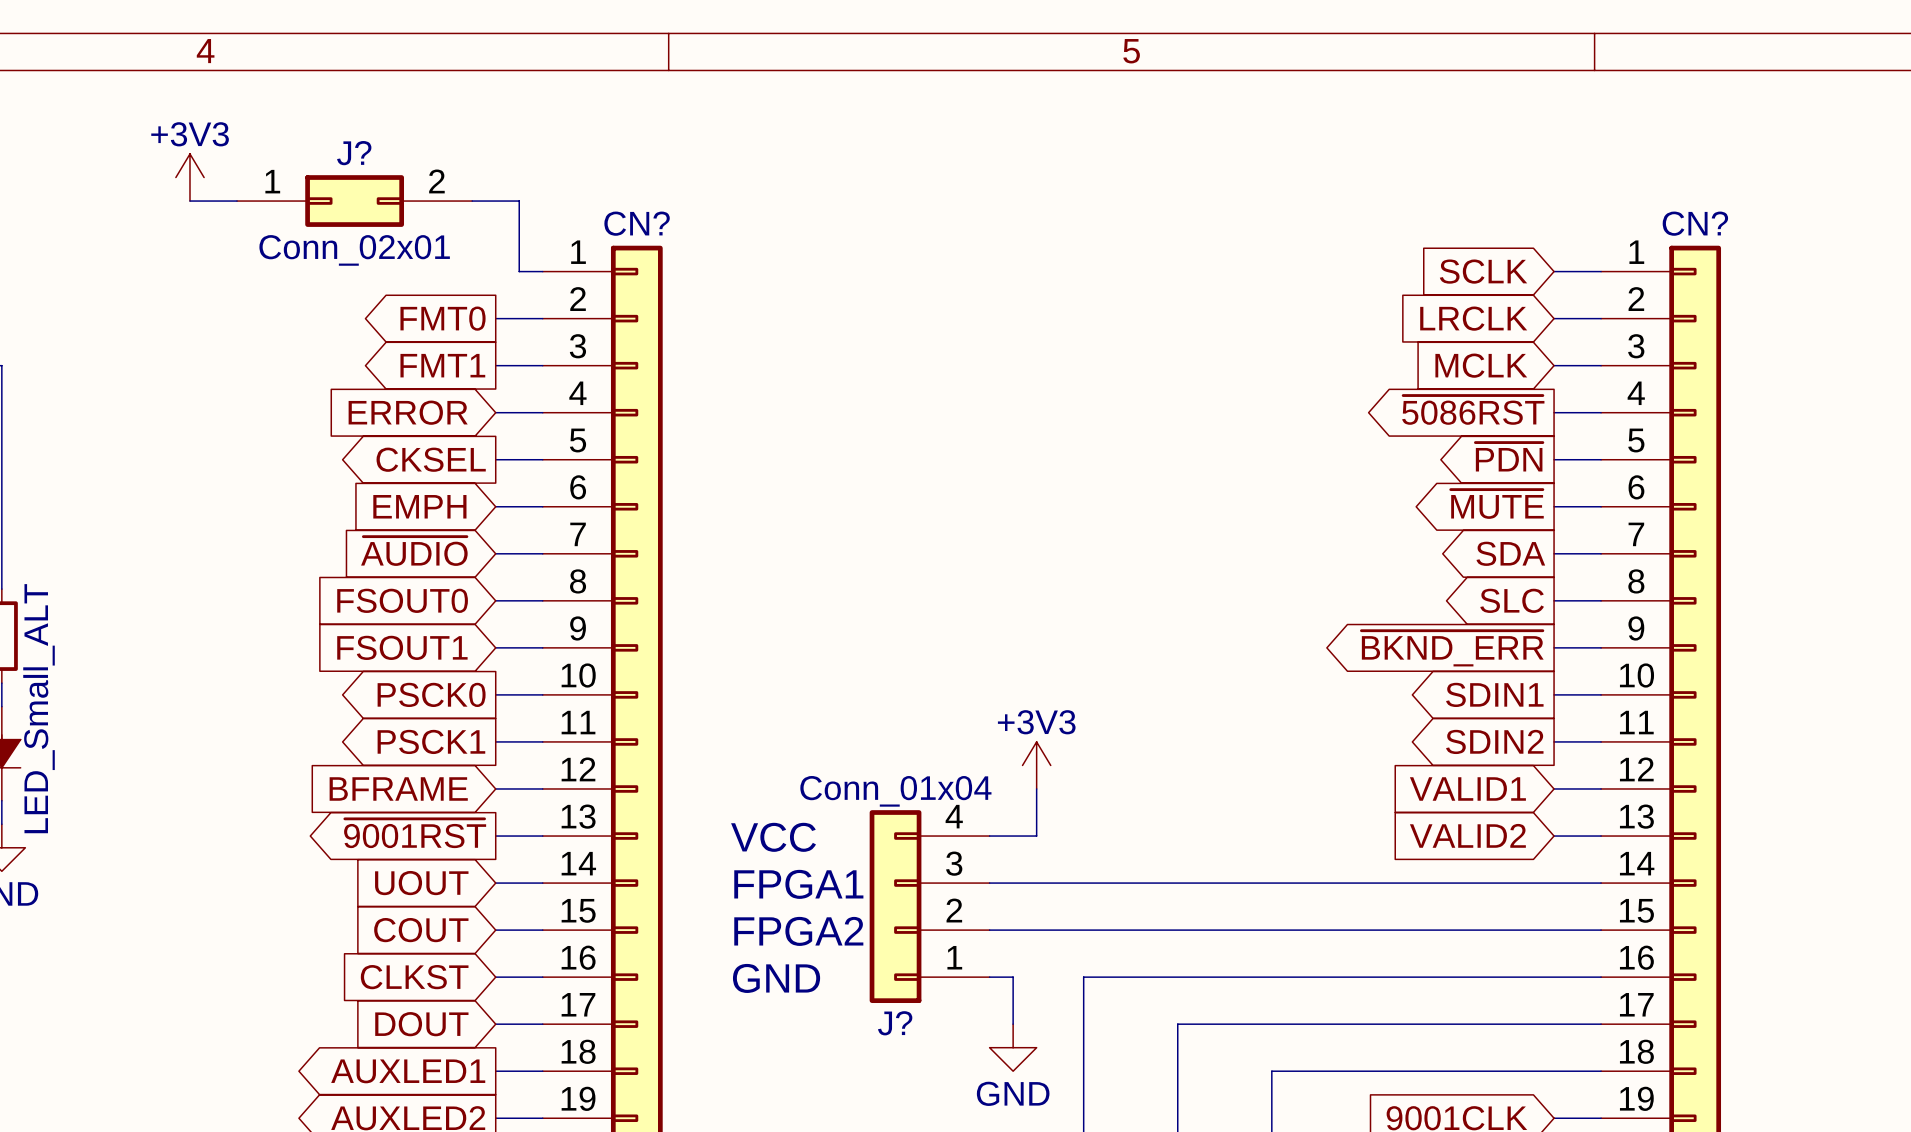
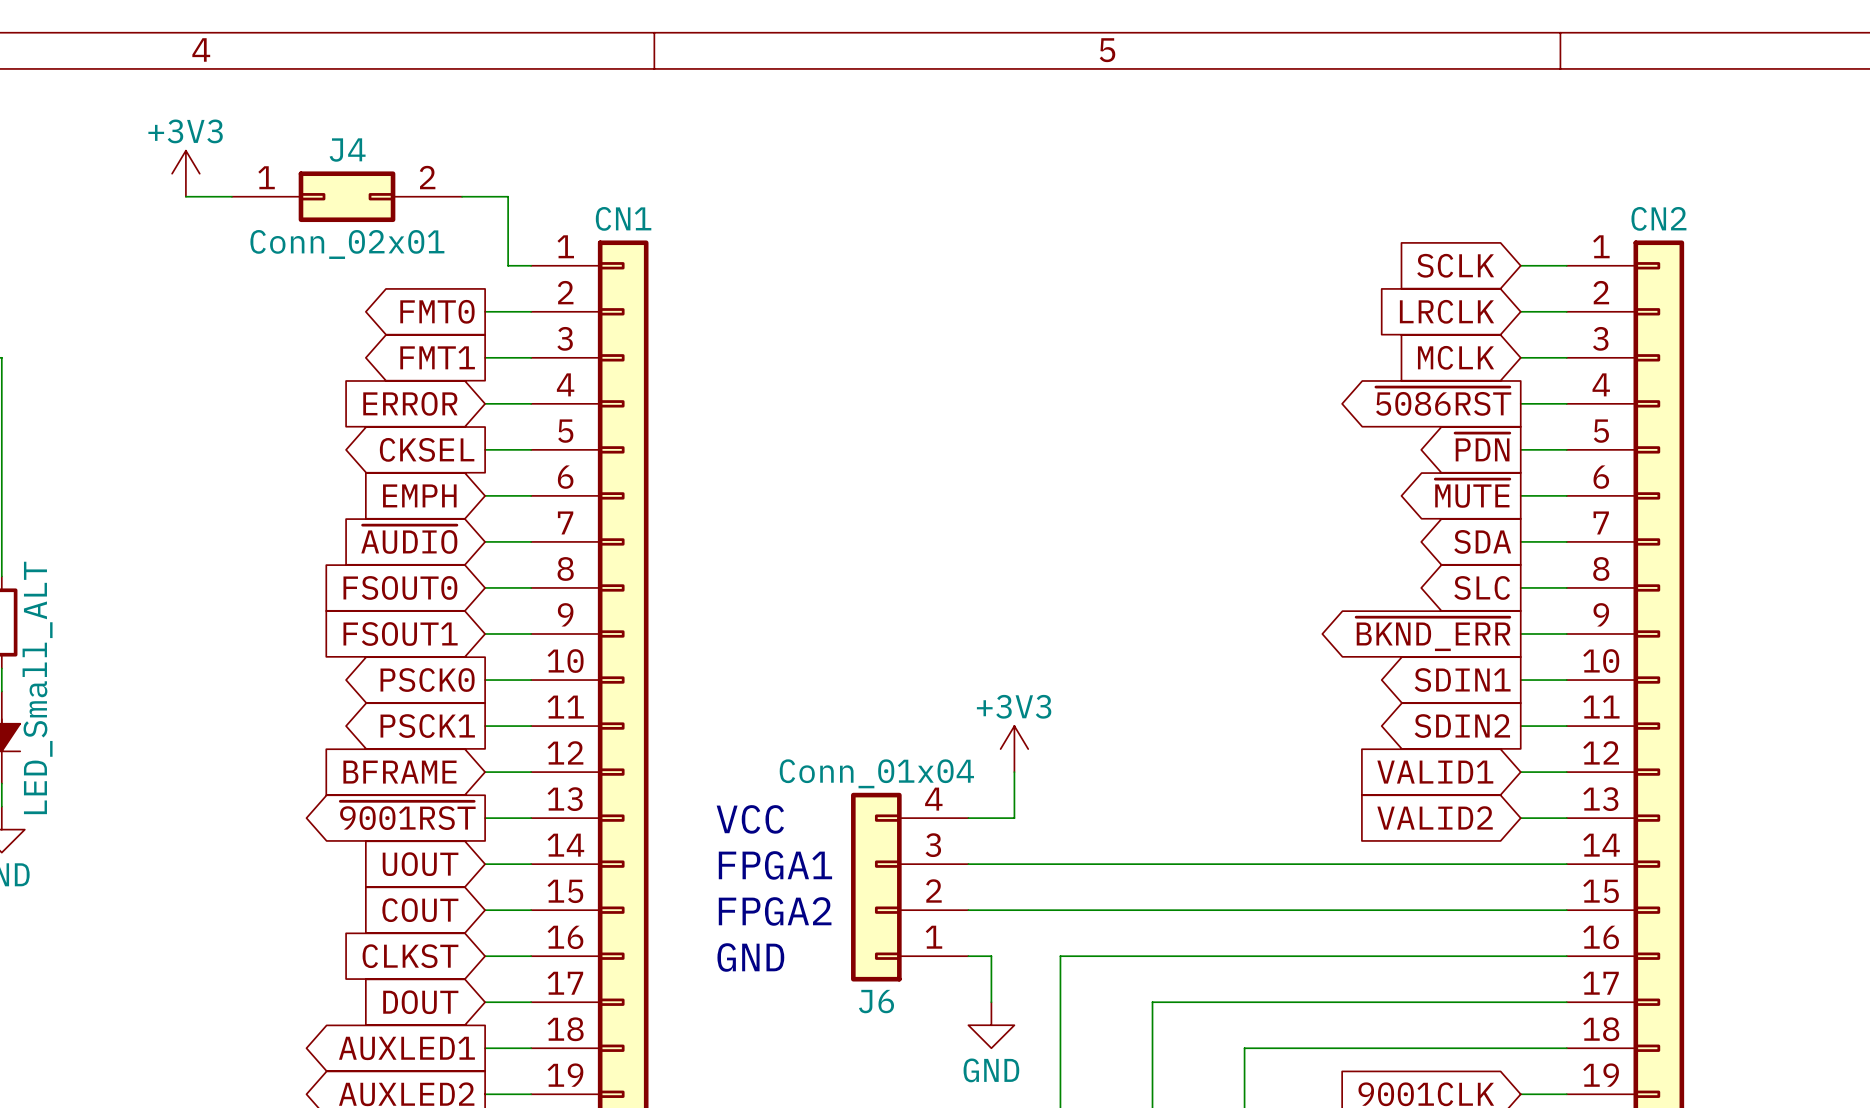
J? name: J? (354, 153) -> J4 (347, 150)
CN? name: CN? (637, 223) -> CN1 (623, 218)
CN? name: CN? (1695, 223) -> CN2 (1658, 218)
J? name: J? (895, 1023) -> J6 (876, 1001)

